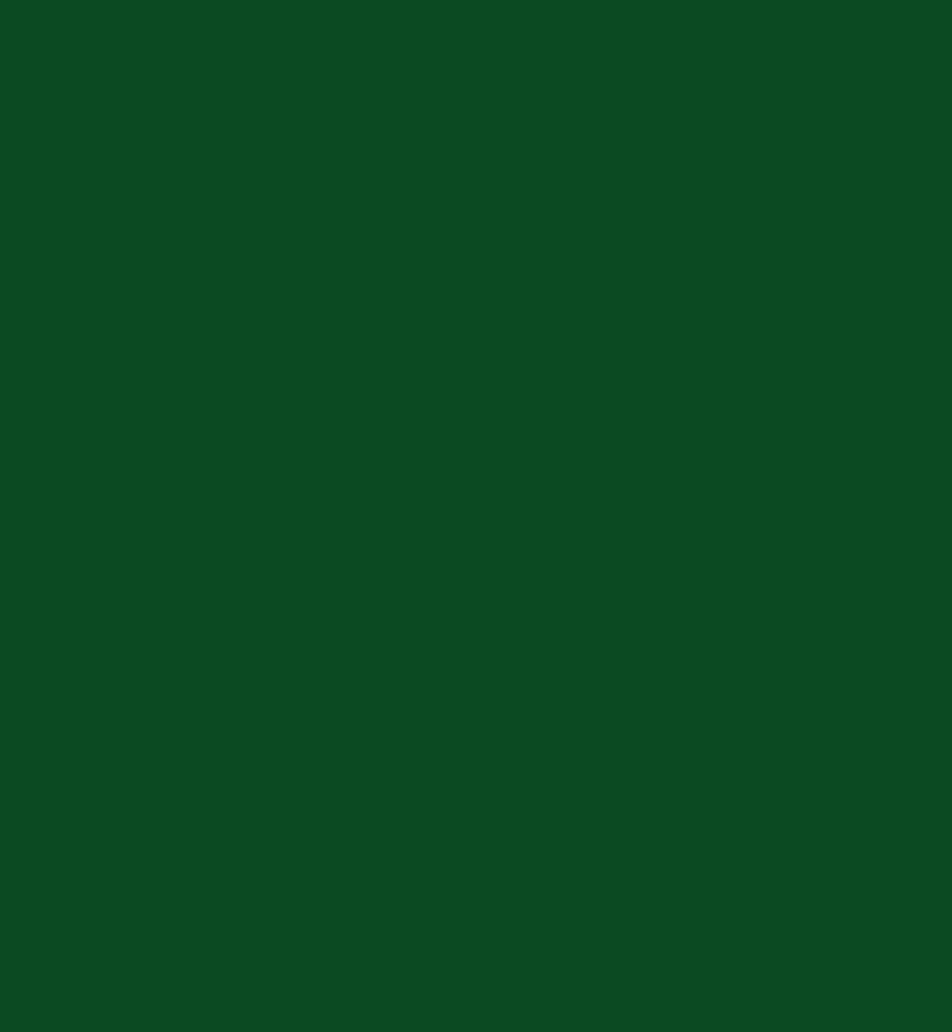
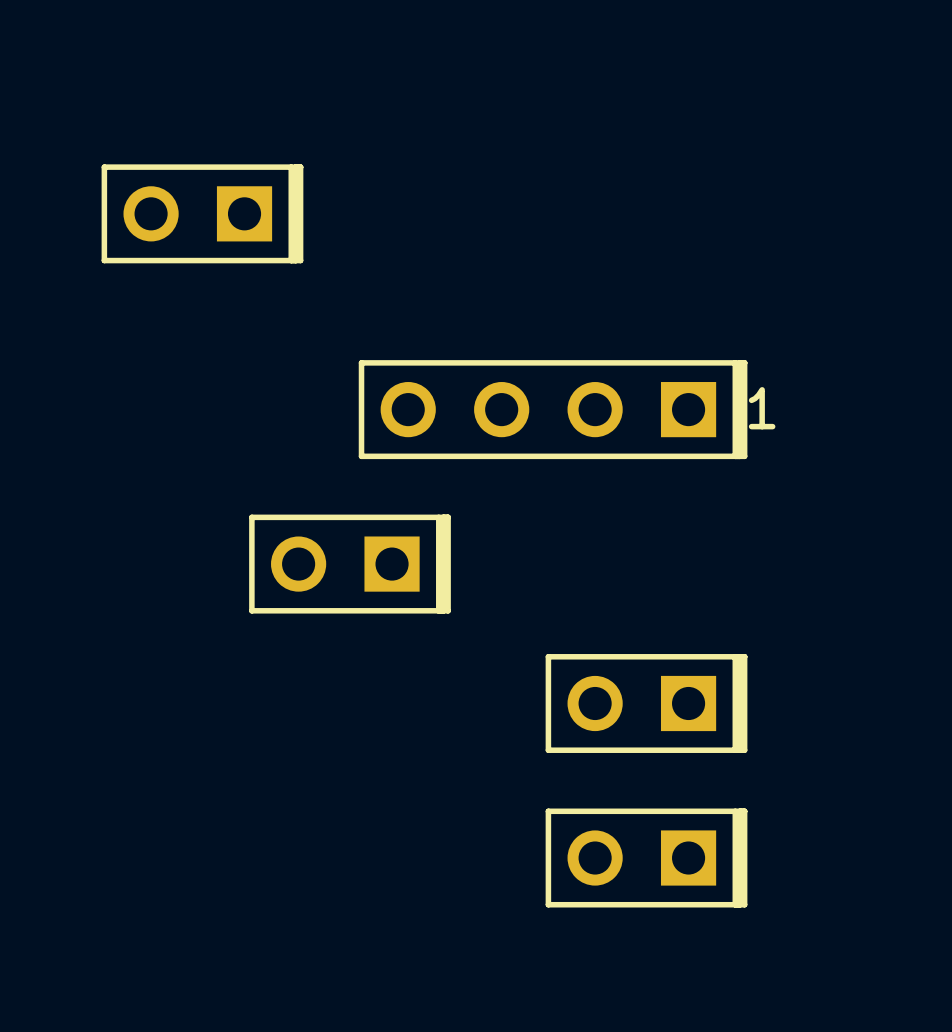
part: none -> (202, 213)
part: none -> (553, 409)
part: none -> (350, 564)
part: none -> (646, 703)
part: none -> (646, 858)

